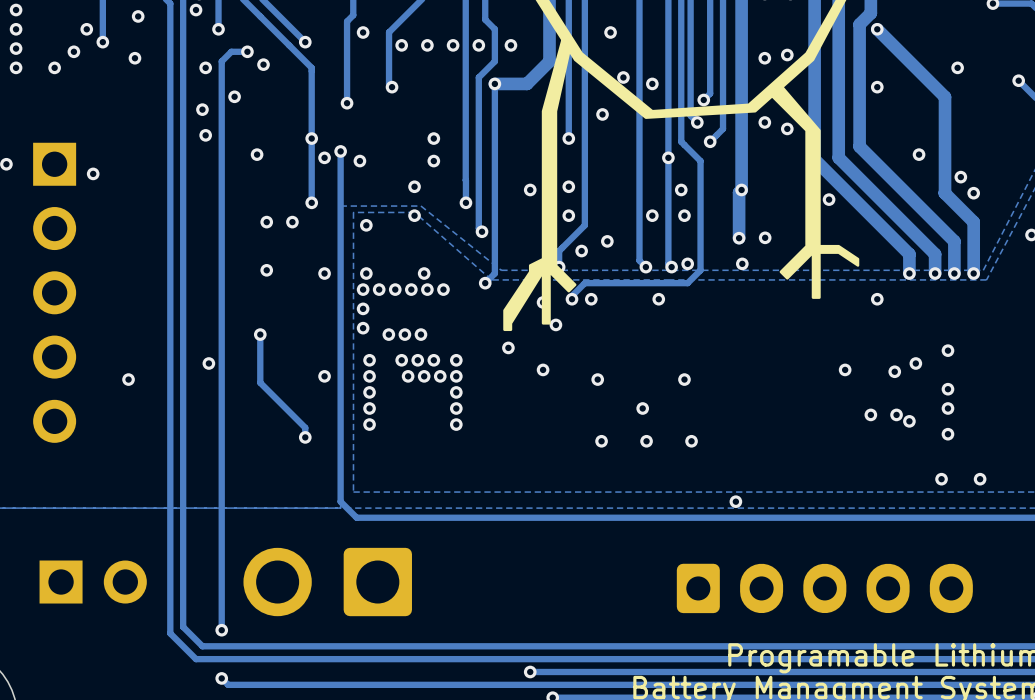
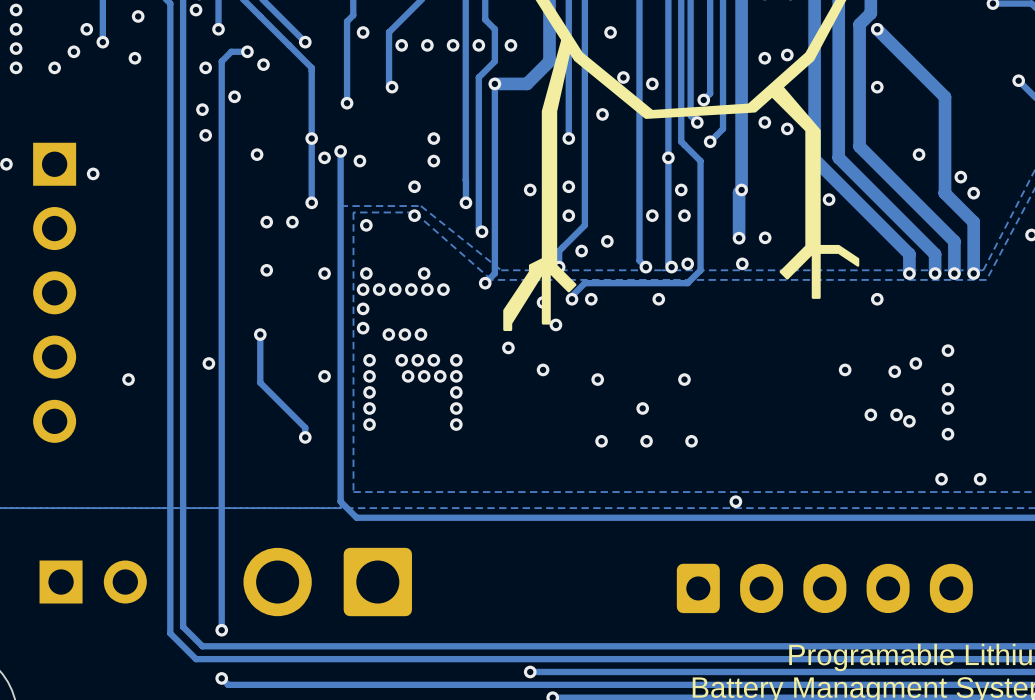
via: (957, 67) -> none

